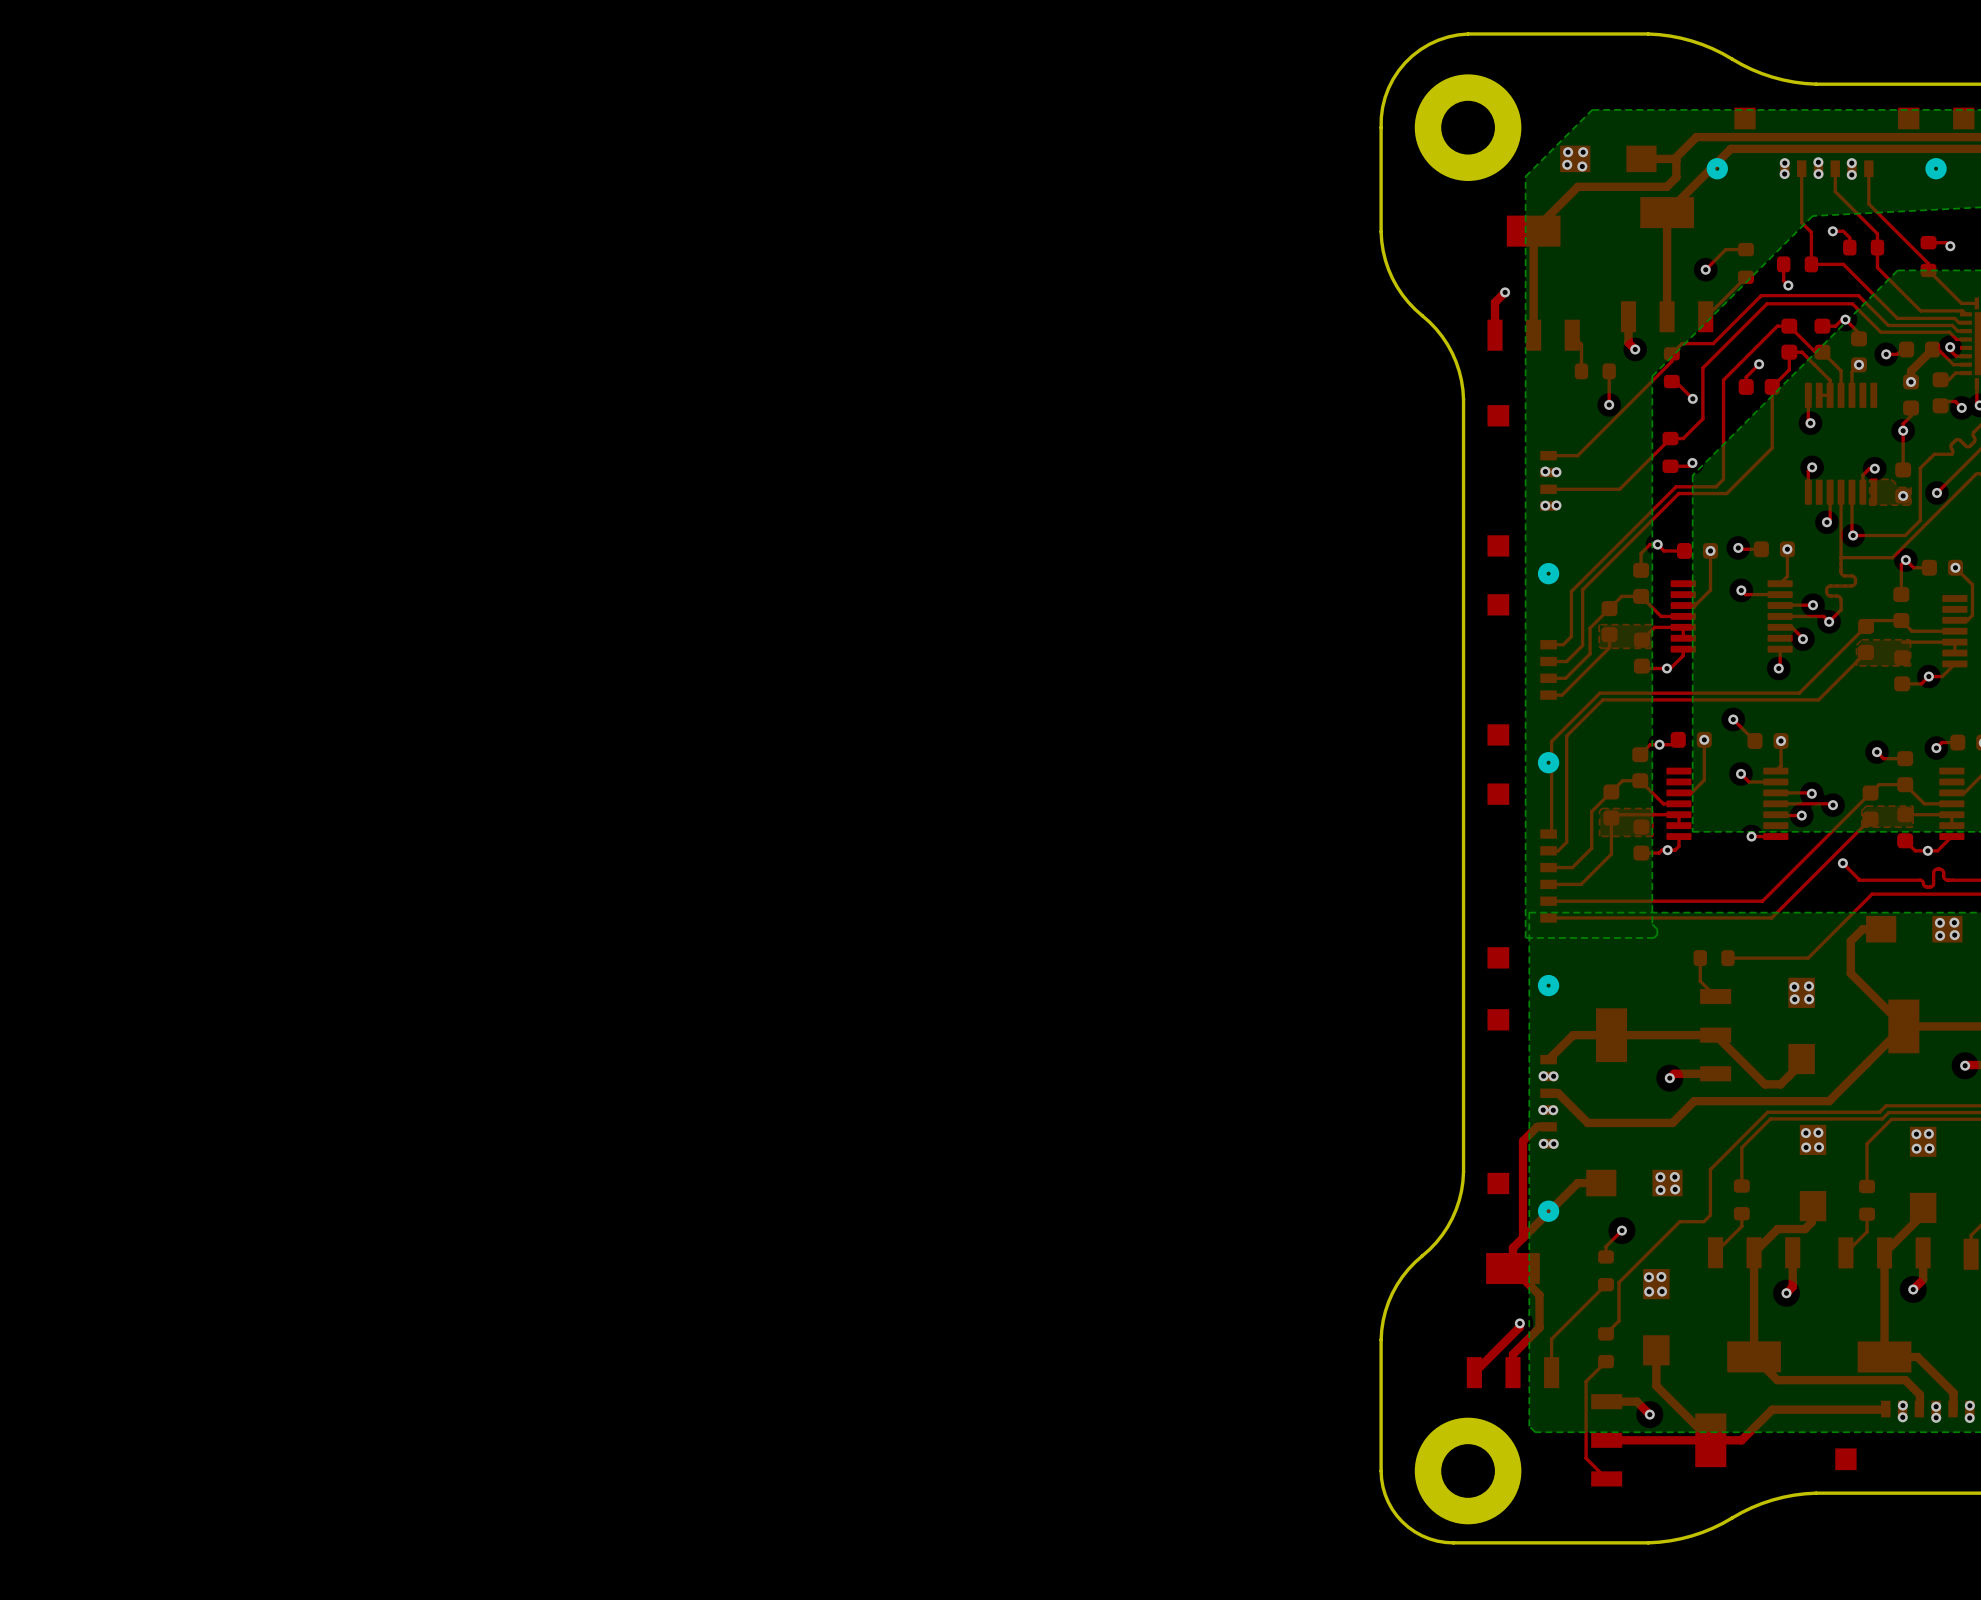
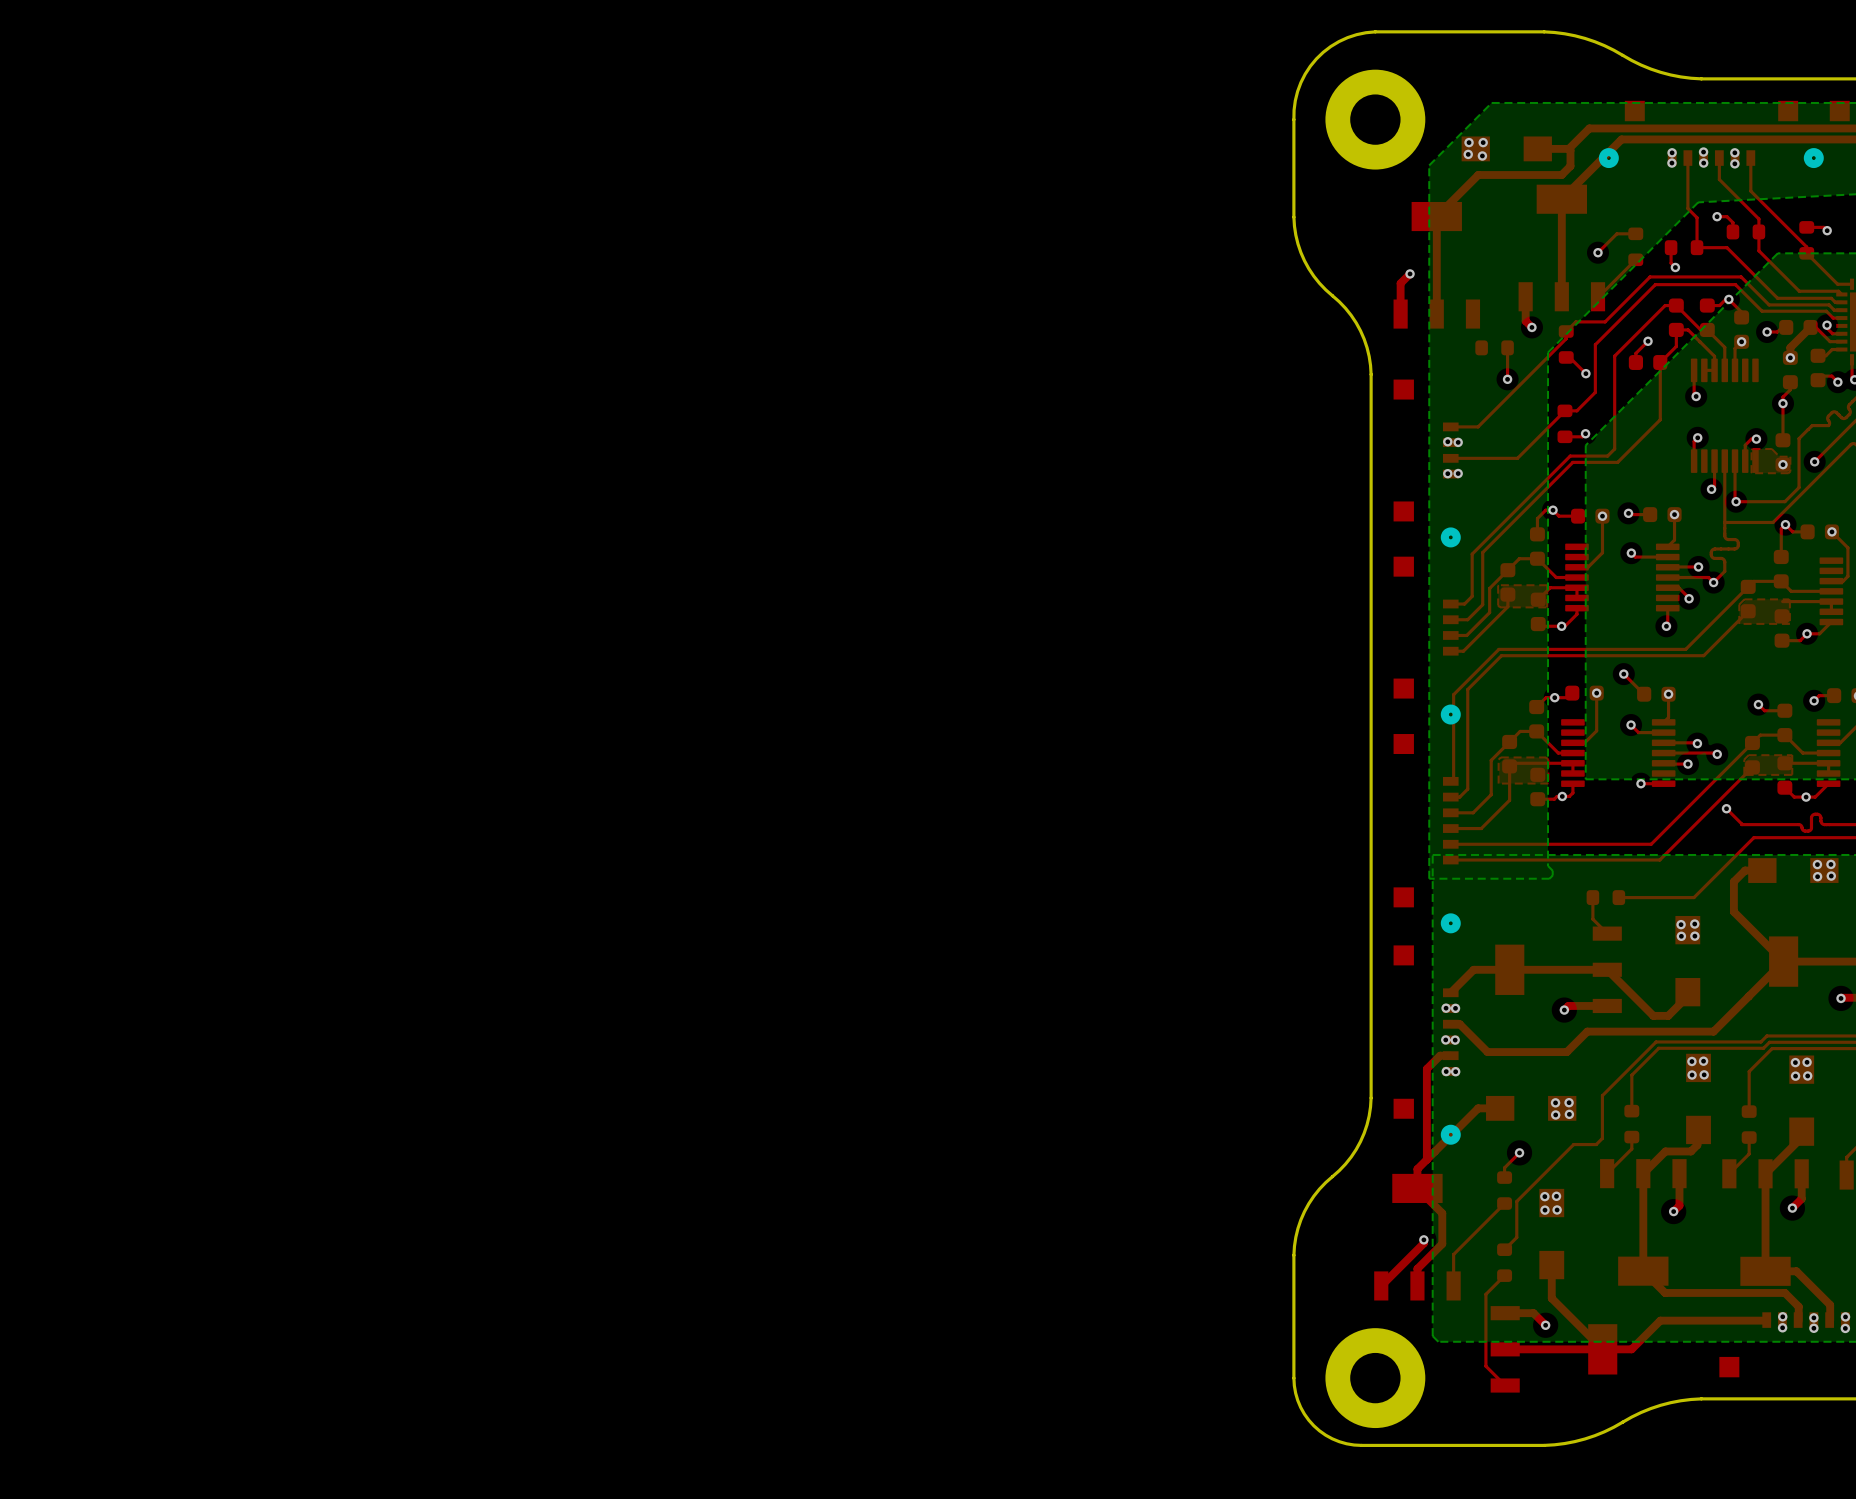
top track: (1572, 335) (1581, 344) (1581, 371) -> none

